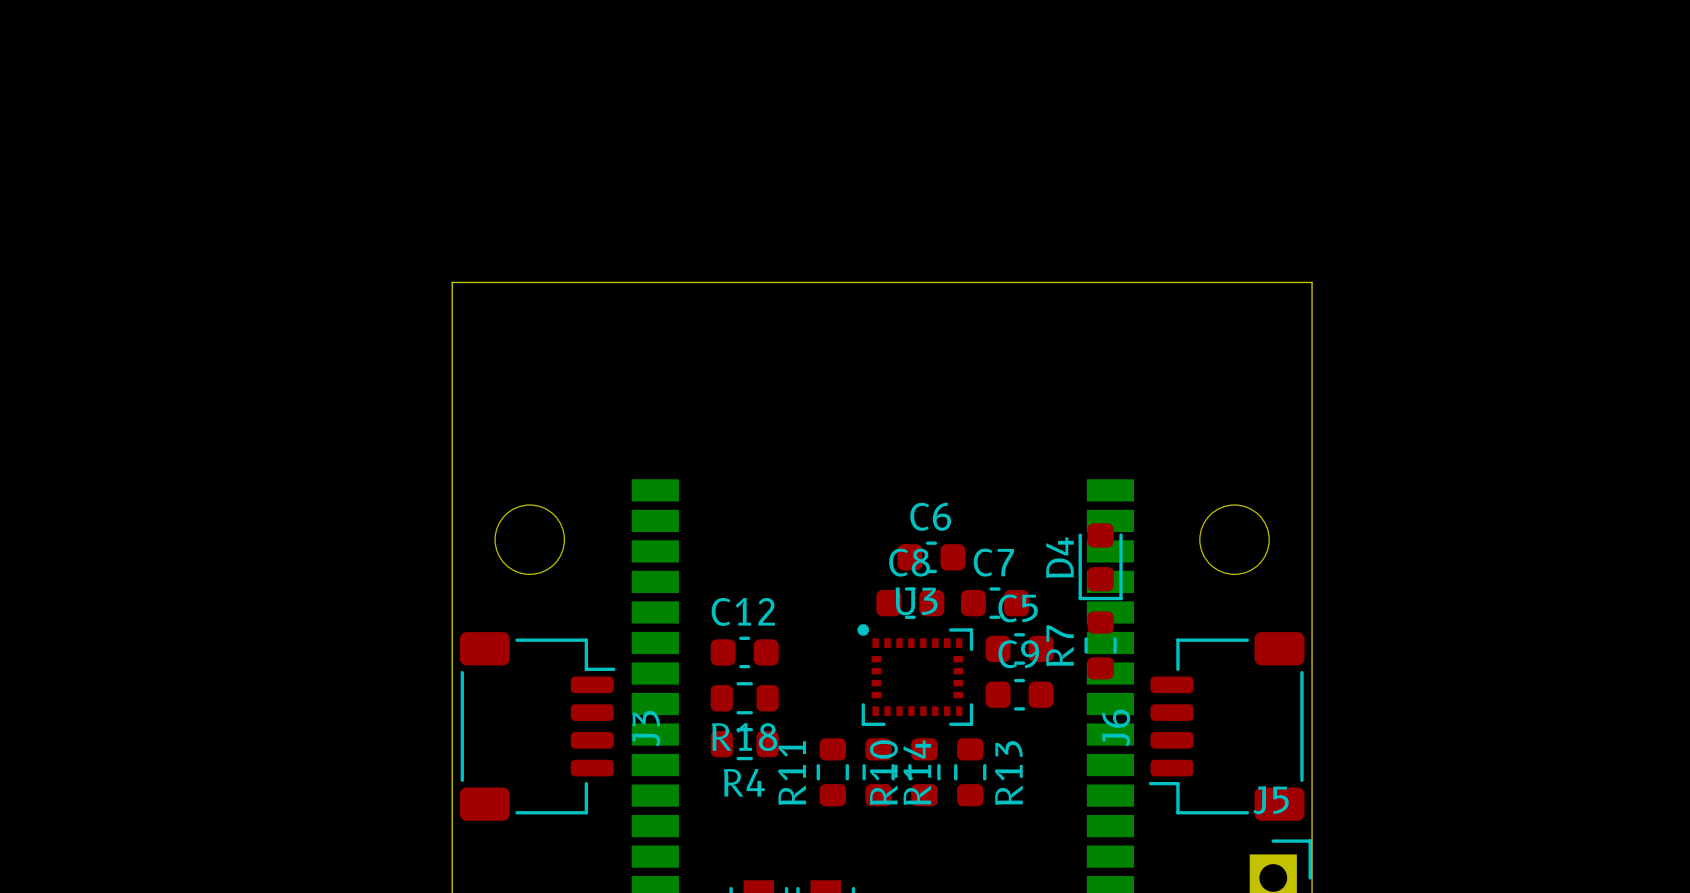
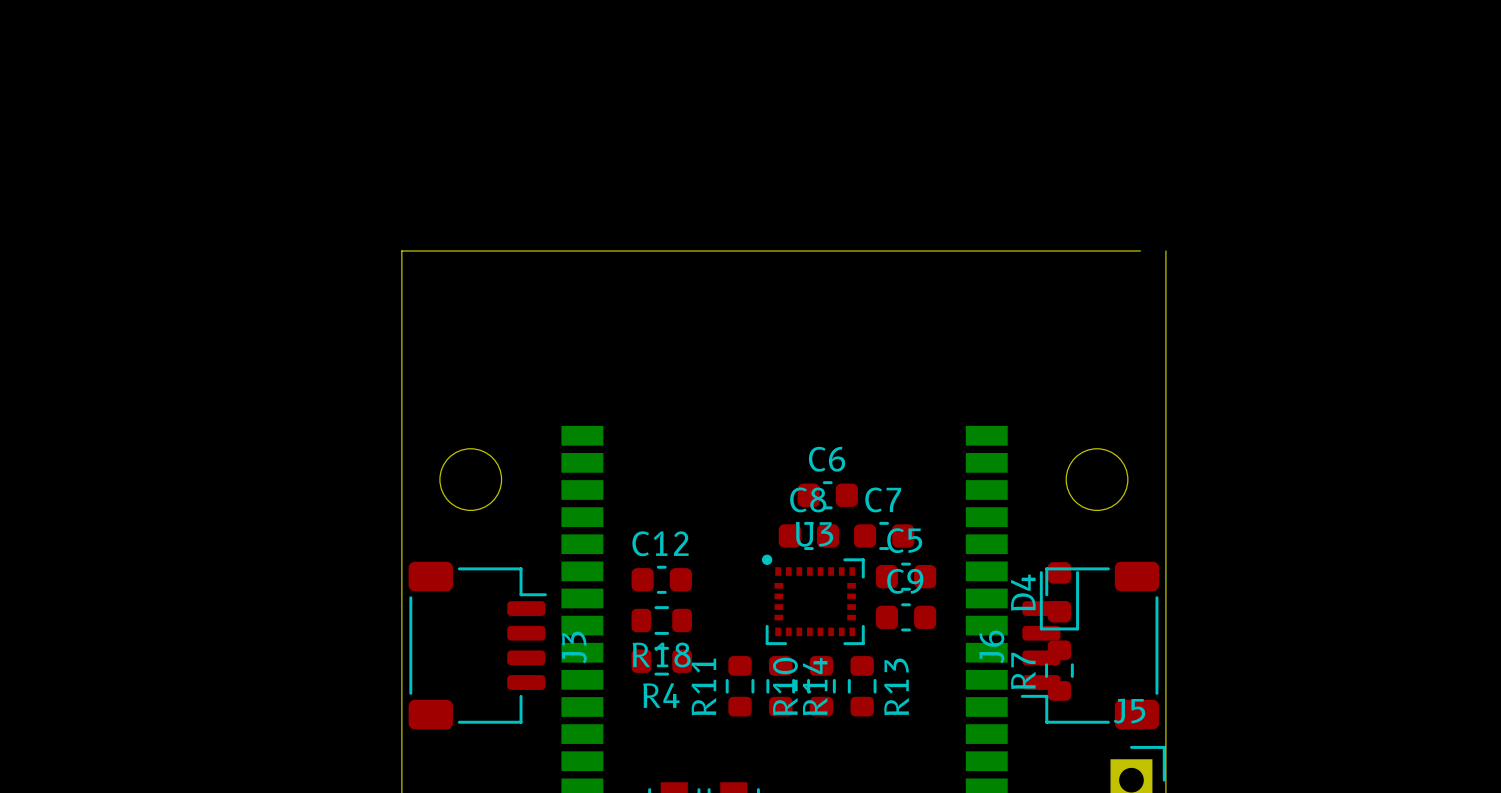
board edge: (1283, 282) (1312, 282) -> none
D4 position: (1100, 561) -> (1059, 596)
R7 position: (1100, 645) -> (1059, 670)

